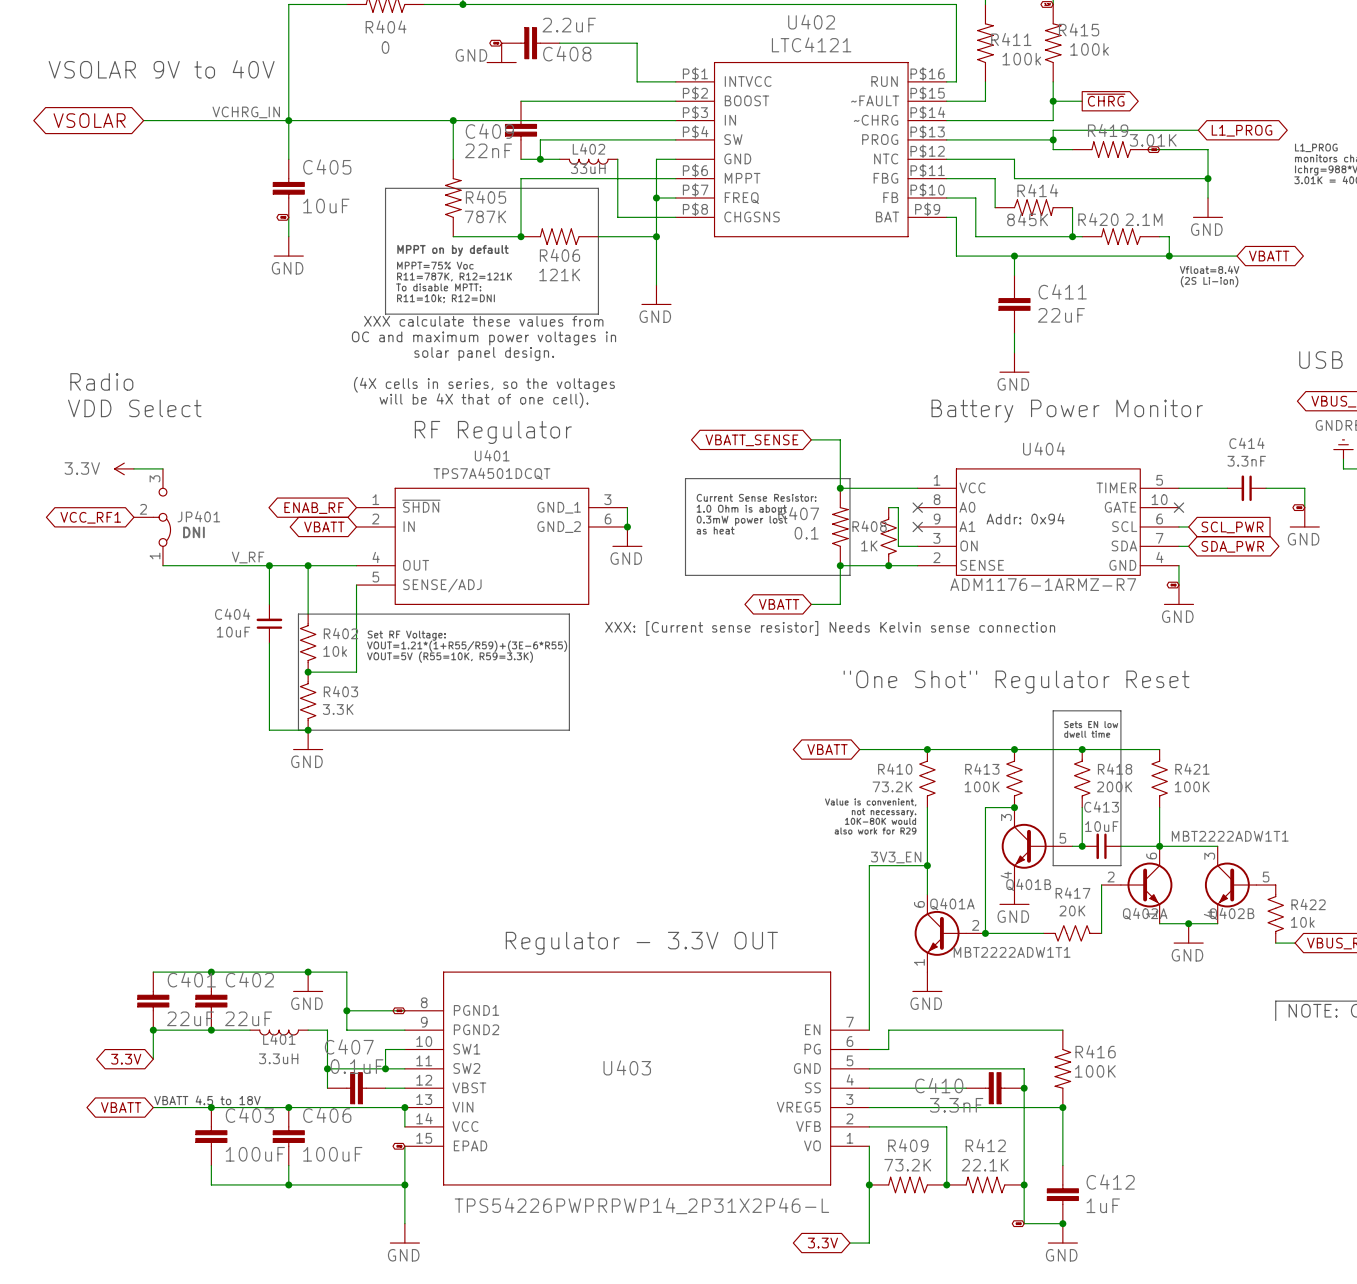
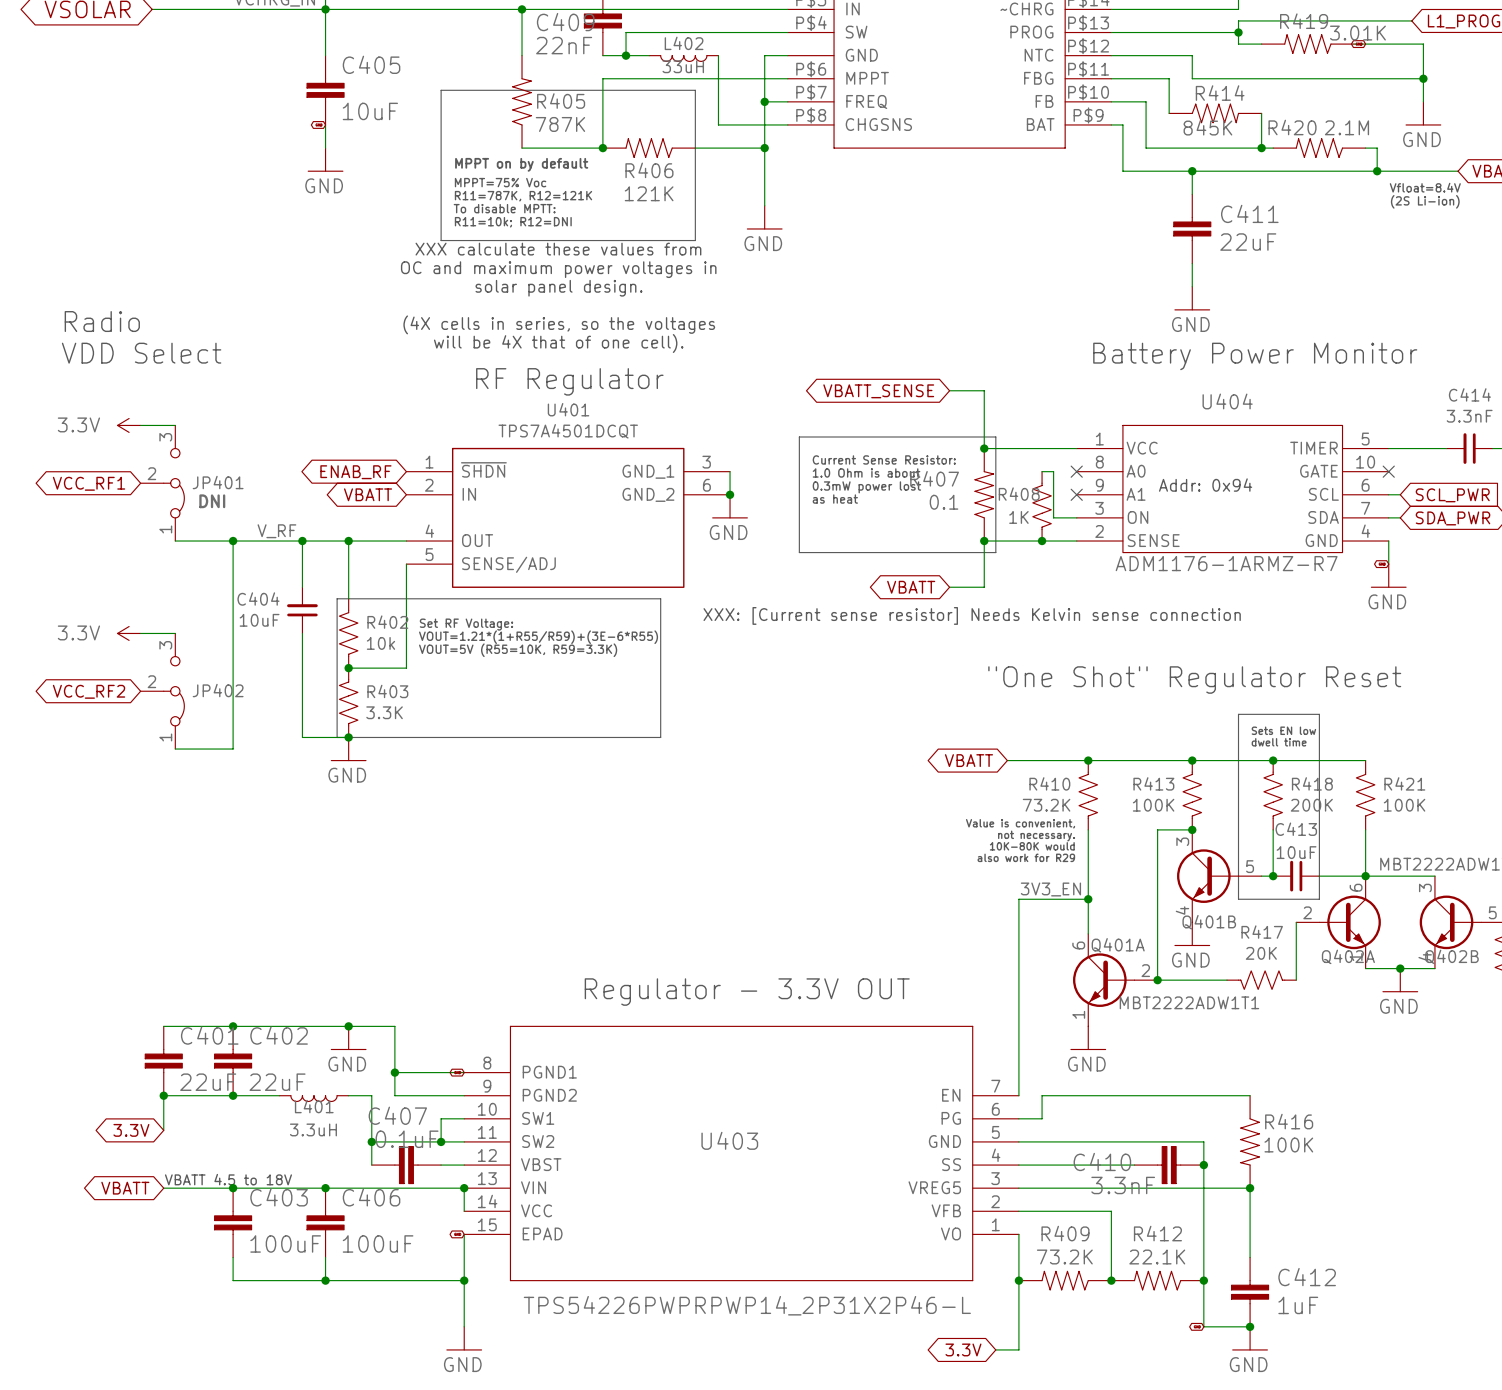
wire: none -> (233, 541) (233, 749) (175, 749)
junction: none -> (233, 541)
power symbol: none -> 3.3V (129, 633)
wire: none -> (140, 633) (175, 633)
global label: none -> VCC_RF2 (89, 691)
JP402: none -> (162, 691)

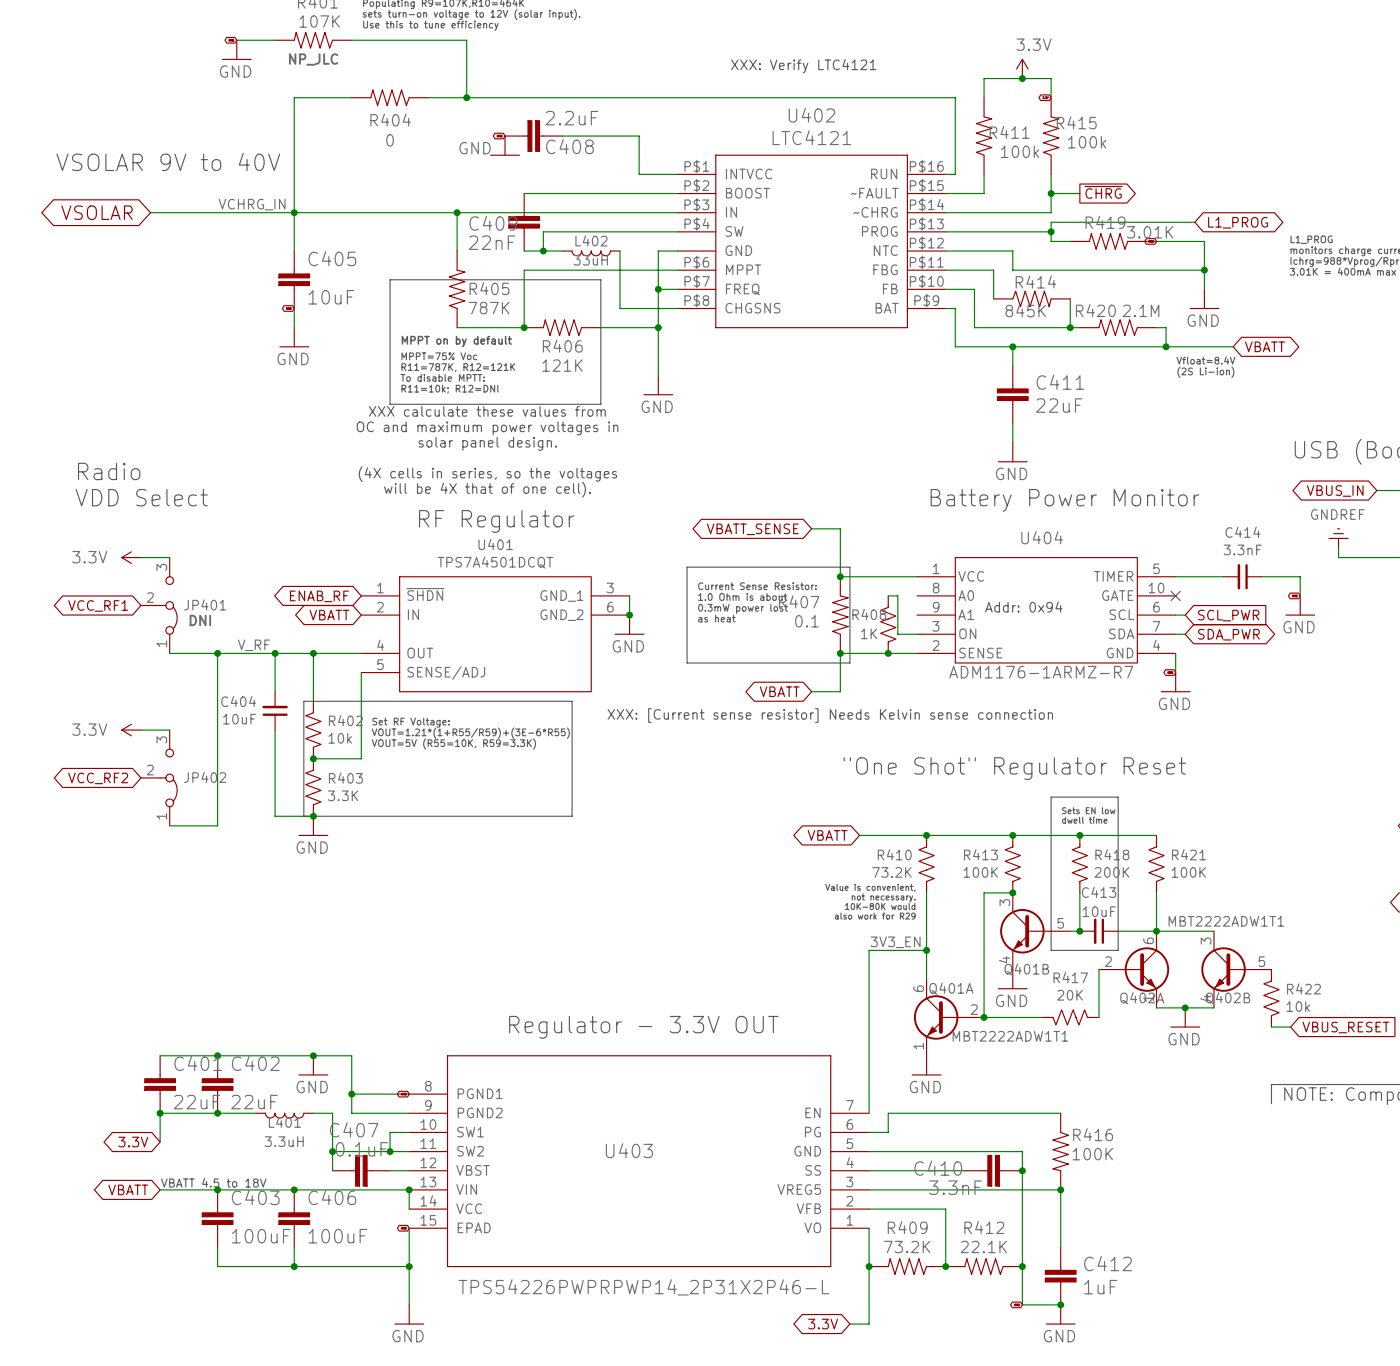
no-connect mark: (1076, 471) -> none
no-connect mark: (1076, 494) -> none

